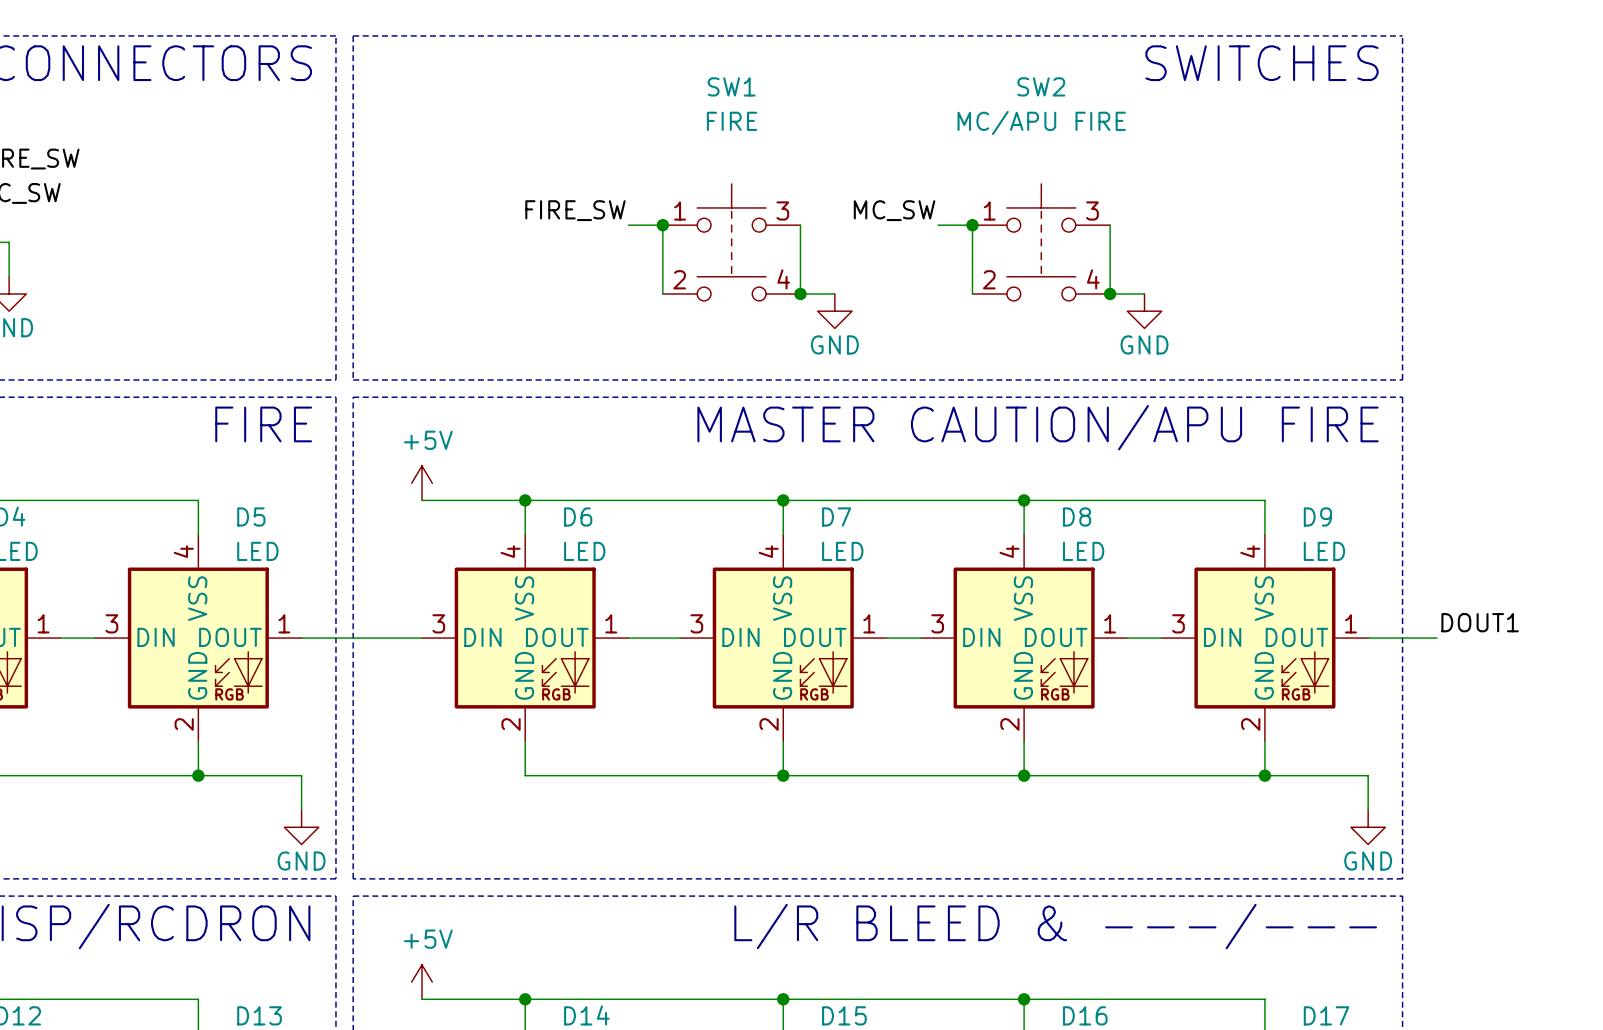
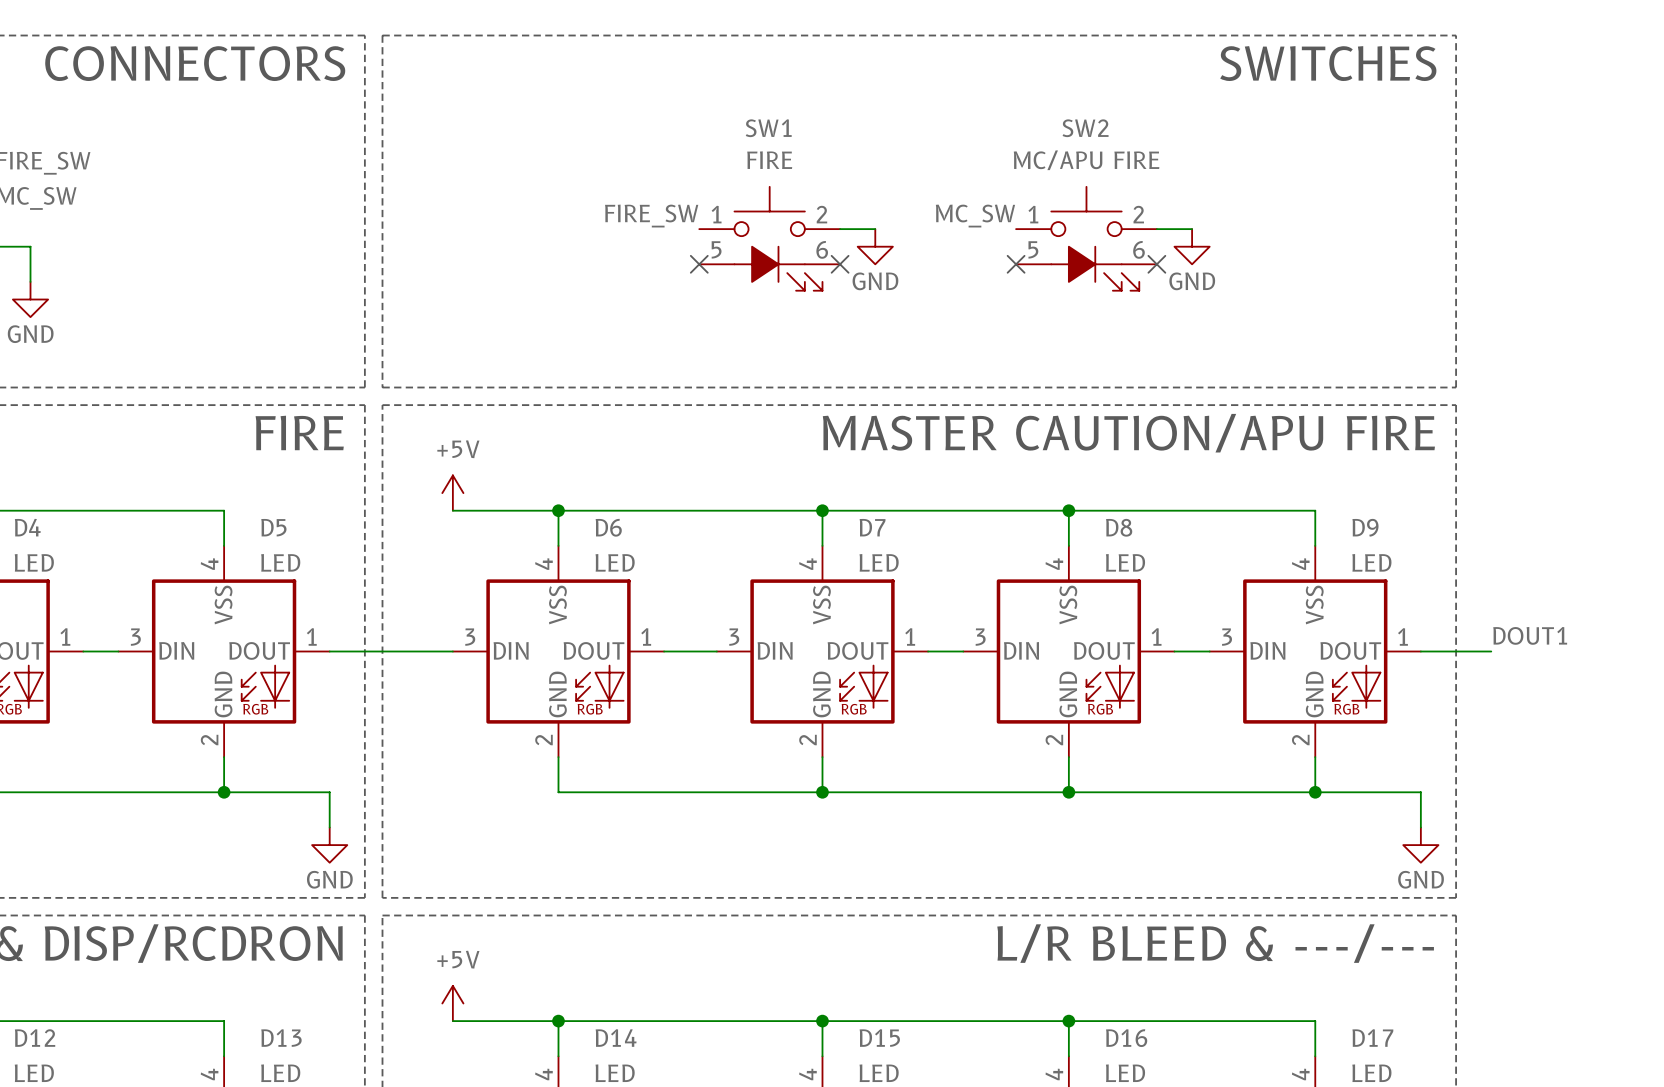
SW1 name position: SW1 (731, 86) -> SW1 (768, 128)
SW2 name position: SW2 (1041, 86) -> SW2 (1085, 128)
SW1 value position: FIRE (732, 121) -> FIRE (769, 160)
SW2 value position: MC/APU FIRE (1041, 122) -> MC/APU FIRE (1086, 160)
SW1 symbol: [662, 183, 801, 301] -> [699, 186, 841, 291]
SW2 symbol: [972, 183, 1111, 301] -> [1016, 186, 1157, 291]
label position: FIRE_SW (575, 210) -> FIRE_SW (651, 216)
label position: MC_SW (894, 210) -> MC_SW (975, 216)
wire: (628, 225) (662, 225) (662, 293) -> none
junction: (662, 225) -> none
wire: (800, 225) (800, 293) (834, 293) -> (840, 229) (875, 229)
wire: (938, 225) (972, 225) (972, 293) -> none
junction: (972, 225) -> none
wire: (1110, 225) (1110, 293) (1144, 293) -> (1156, 229) (1192, 229)
no-connect mark: none -> (699, 264)
no-connect mark: none -> (840, 264)
no-connect mark: none -> (1016, 264)
no-connect mark: none -> (1156, 264)
junction: (800, 293) -> none
junction: (1110, 293) -> none
power symbol position: GND (834, 311) -> GND (875, 246)
power symbol position: GND (1144, 311) -> GND (1192, 246)

